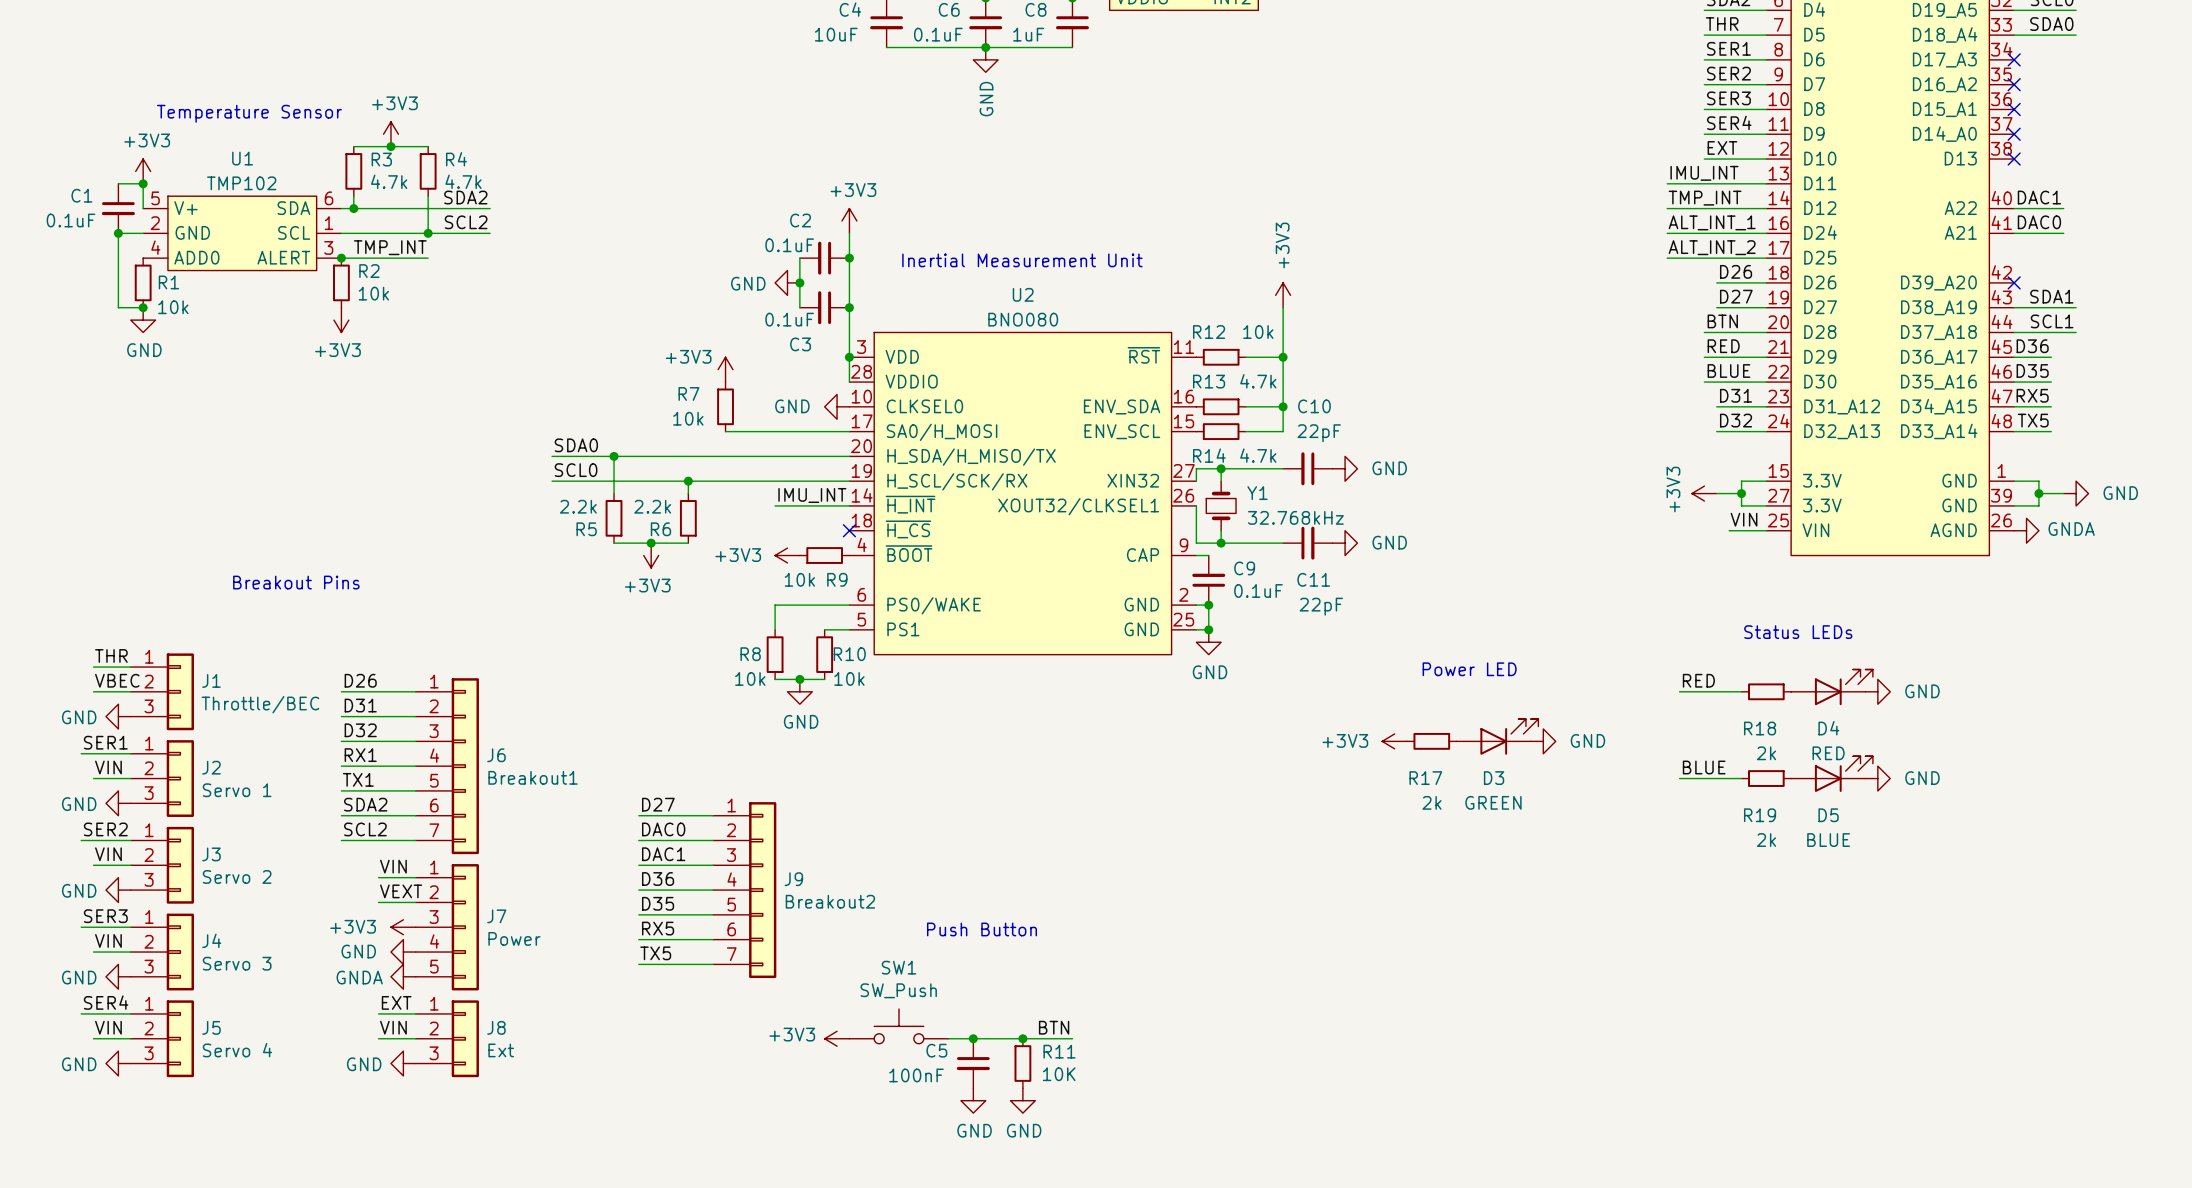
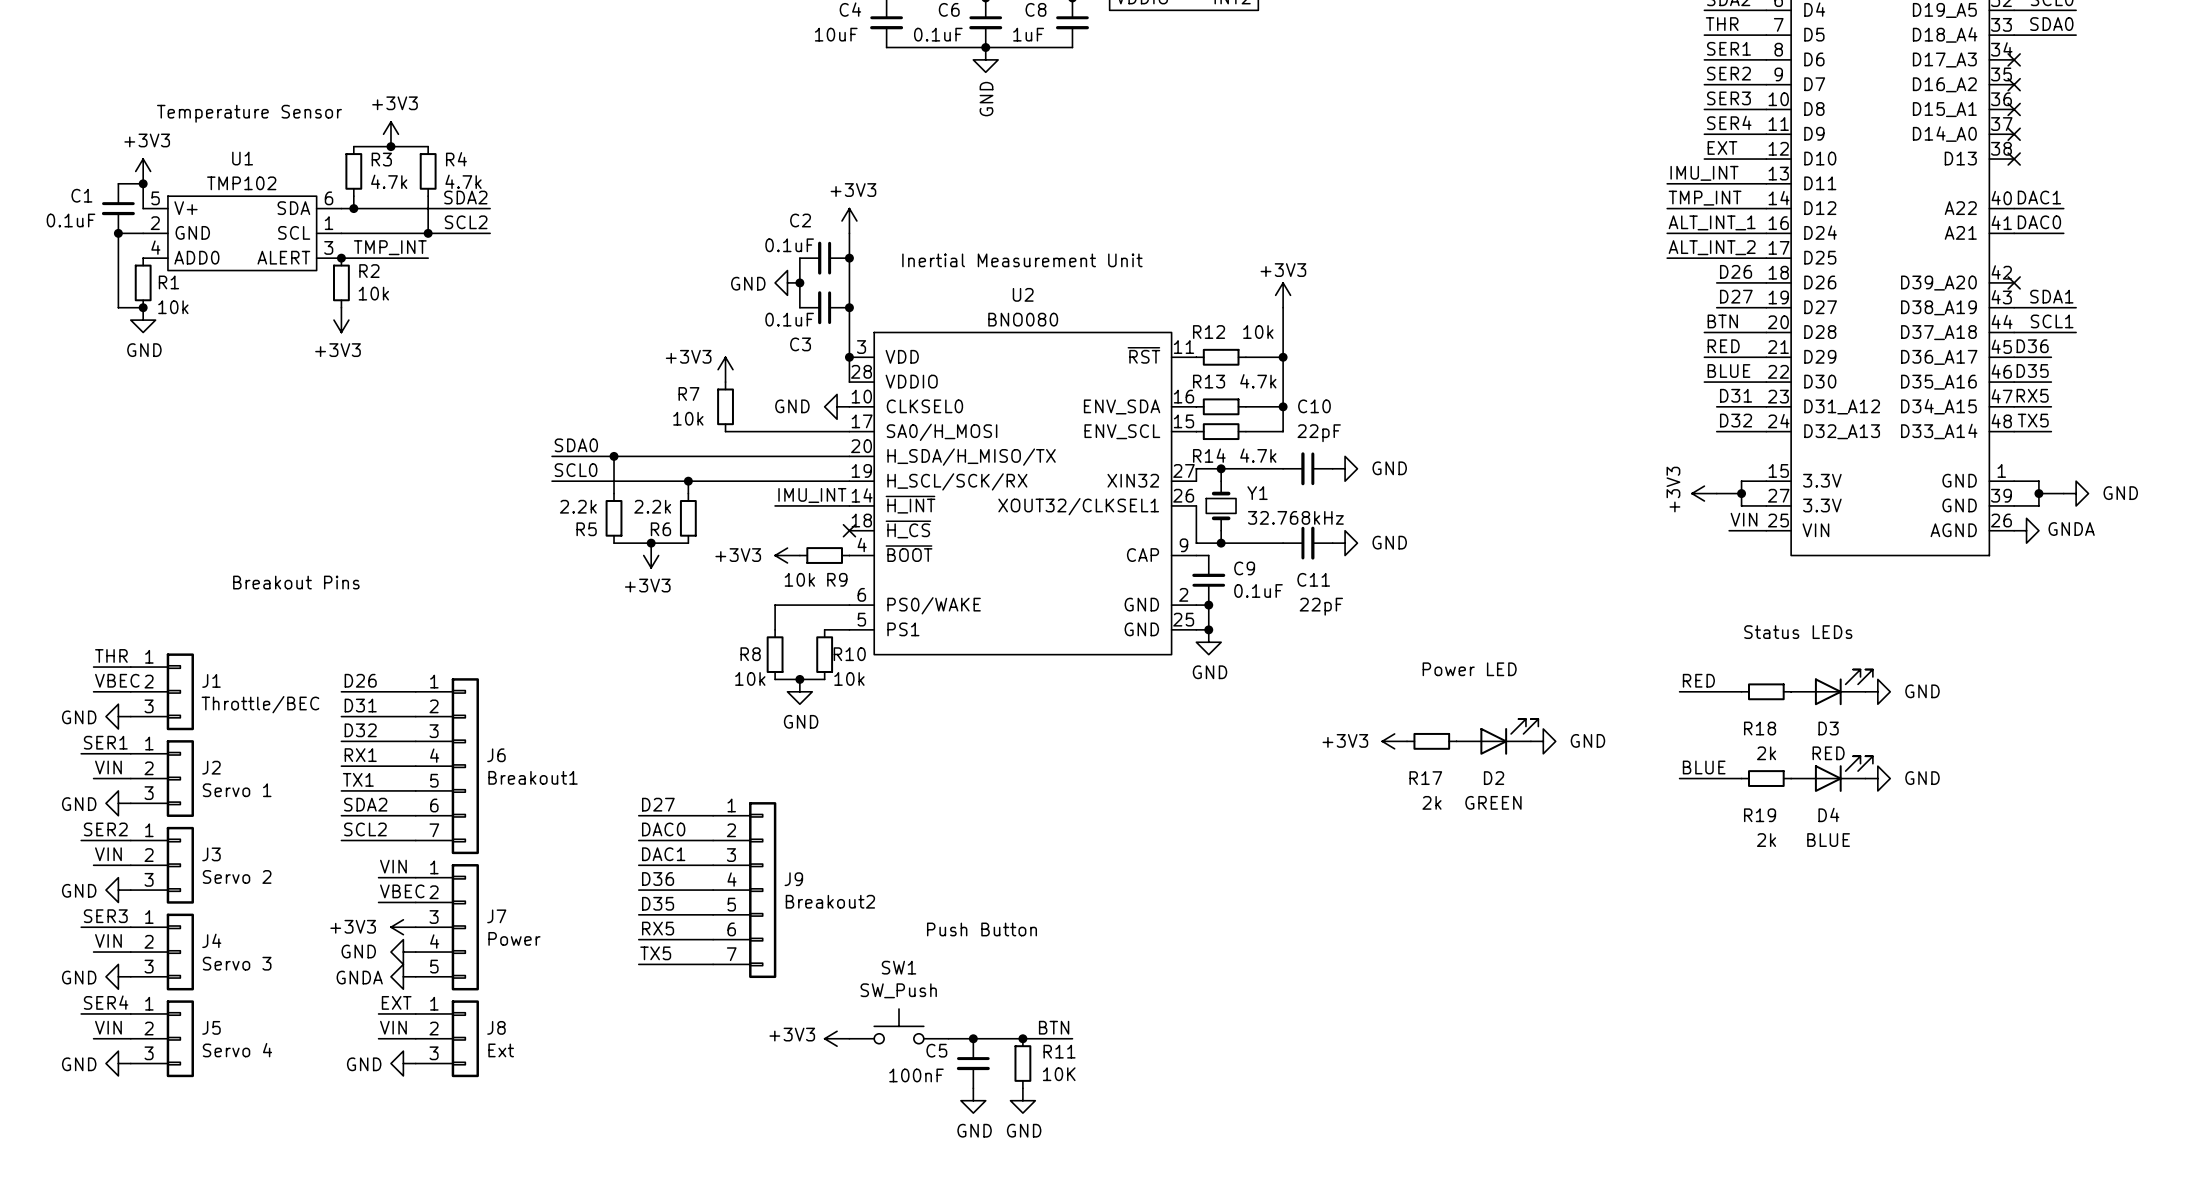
power symbol text rotation: 0° (1282, 245) -> 90° clockwise (1283, 270)
D4 name: D4 (1828, 728) -> D3 (1828, 728)
D3 name: D3 (1494, 778) -> D2 (1494, 778)
D5 name: D5 (1828, 815) -> D4 (1828, 814)
label: VEXT (401, 891) -> VBEC (402, 891)

